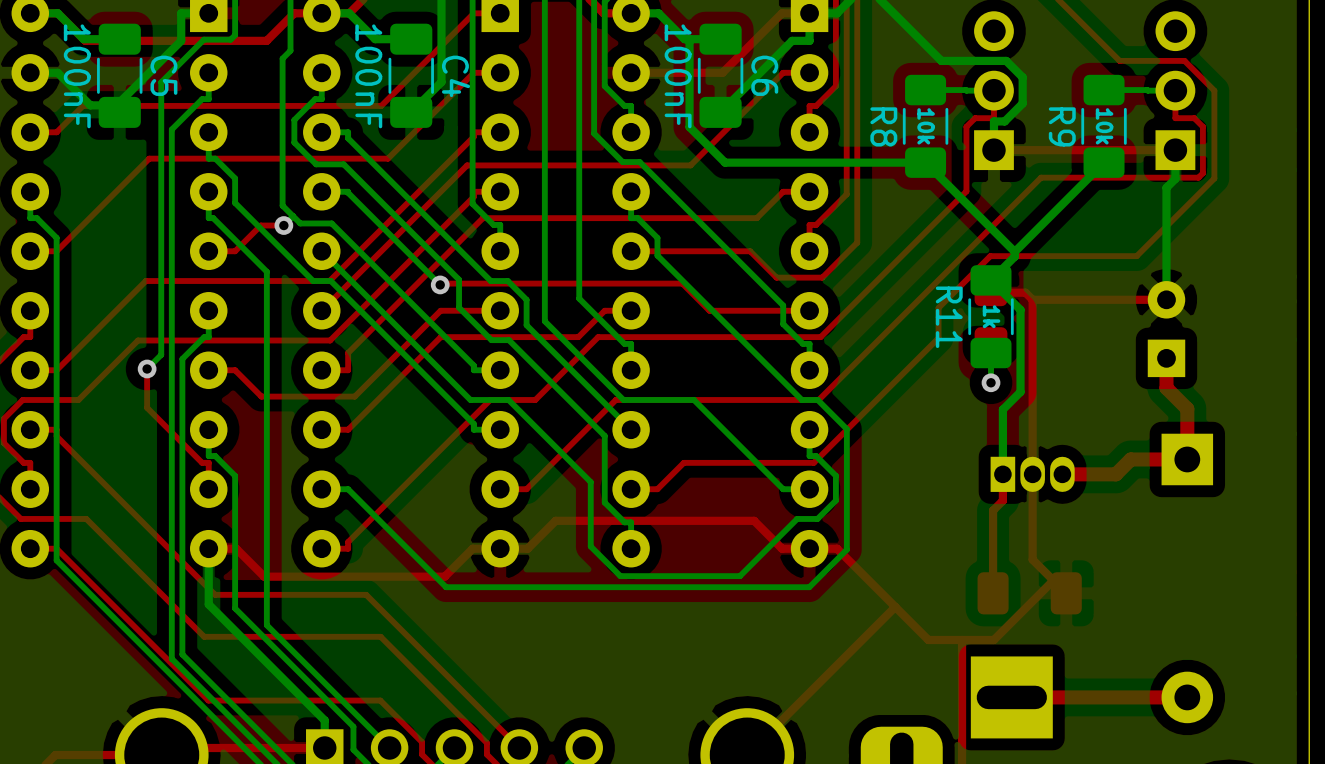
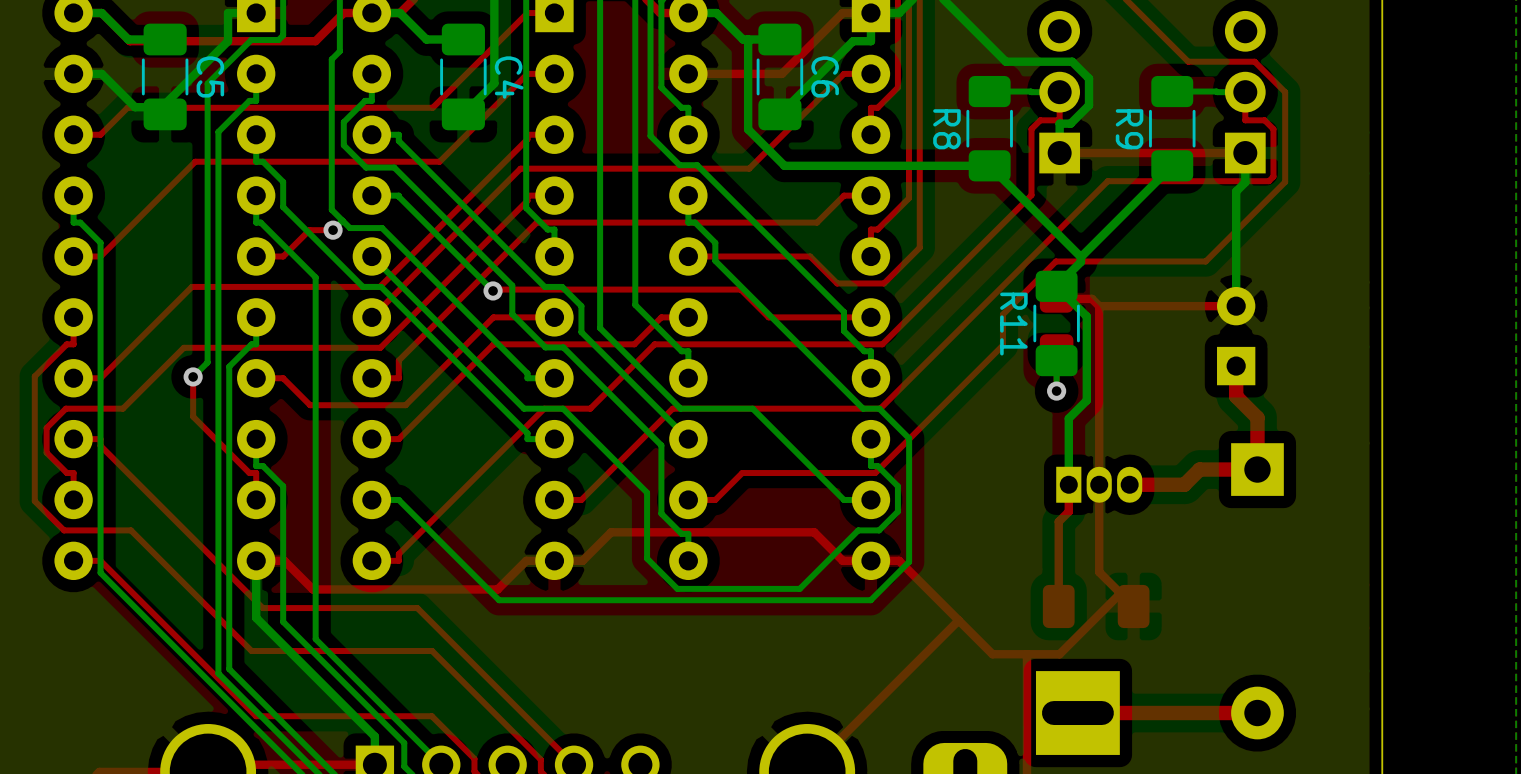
C5 value: 100nF (77, 76) -> none
C4 value: 100nF (368, 76) -> none
C6 value: 100nF (678, 76) -> none
R8 value: 10k (926, 126) -> none
R9 value: 10k (1104, 126) -> none
R11 value: 1k (991, 316) -> none

